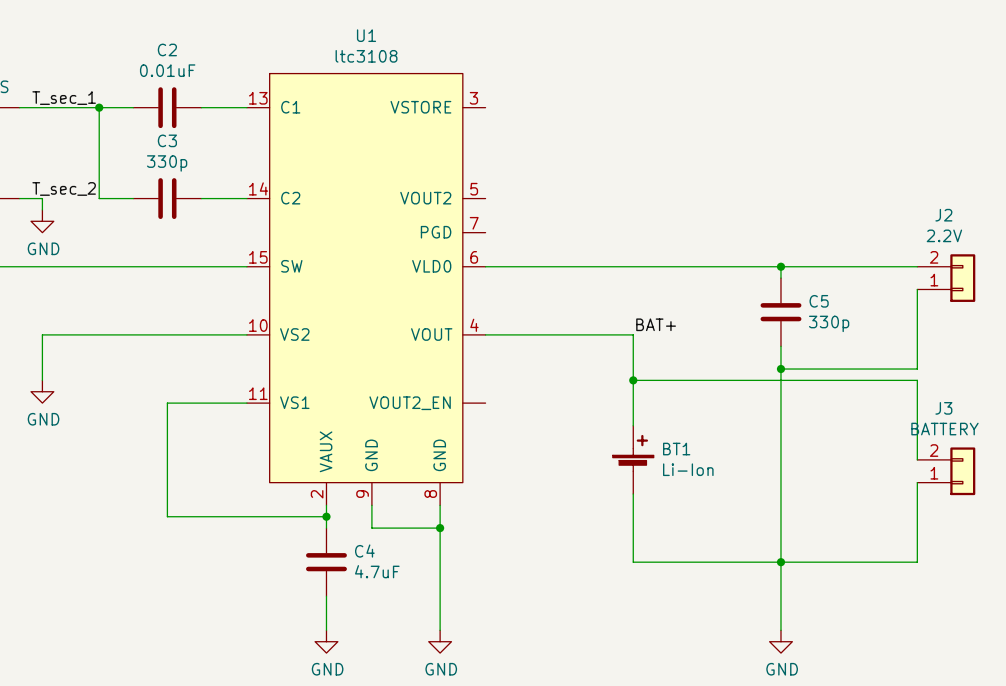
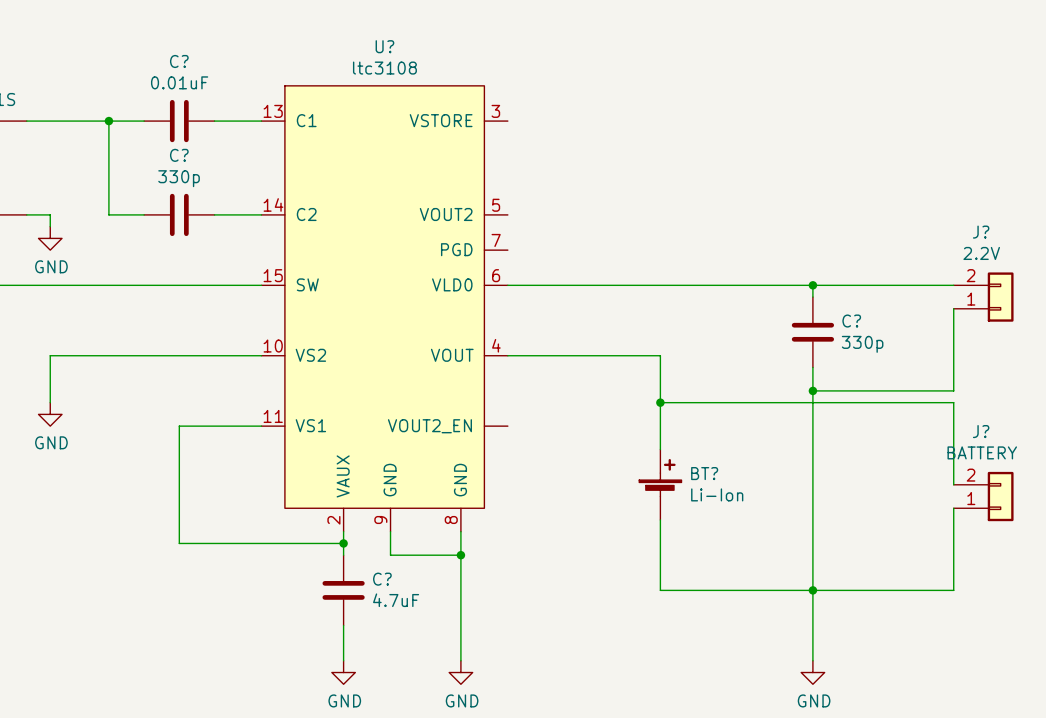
U1 name: U1 (366, 35) -> U? (384, 46)
C2 name: C2 (167, 49) -> C? (179, 61)
label: T_sec_1 (64, 98) -> none
C3 name: C3 (167, 140) -> C? (179, 155)
label: T_sec_2 (64, 188) -> none
J2 name: J2 (943, 215) -> J? (981, 232)
C5 name: C5 (819, 301) -> C? (851, 321)
label: BAT+ (656, 324) -> none
J3 name: J3 (943, 408) -> J? (981, 431)
BT1 name: BT1 (676, 449) -> BT? (704, 473)
C4 name: C4 (364, 551) -> C? (382, 579)

